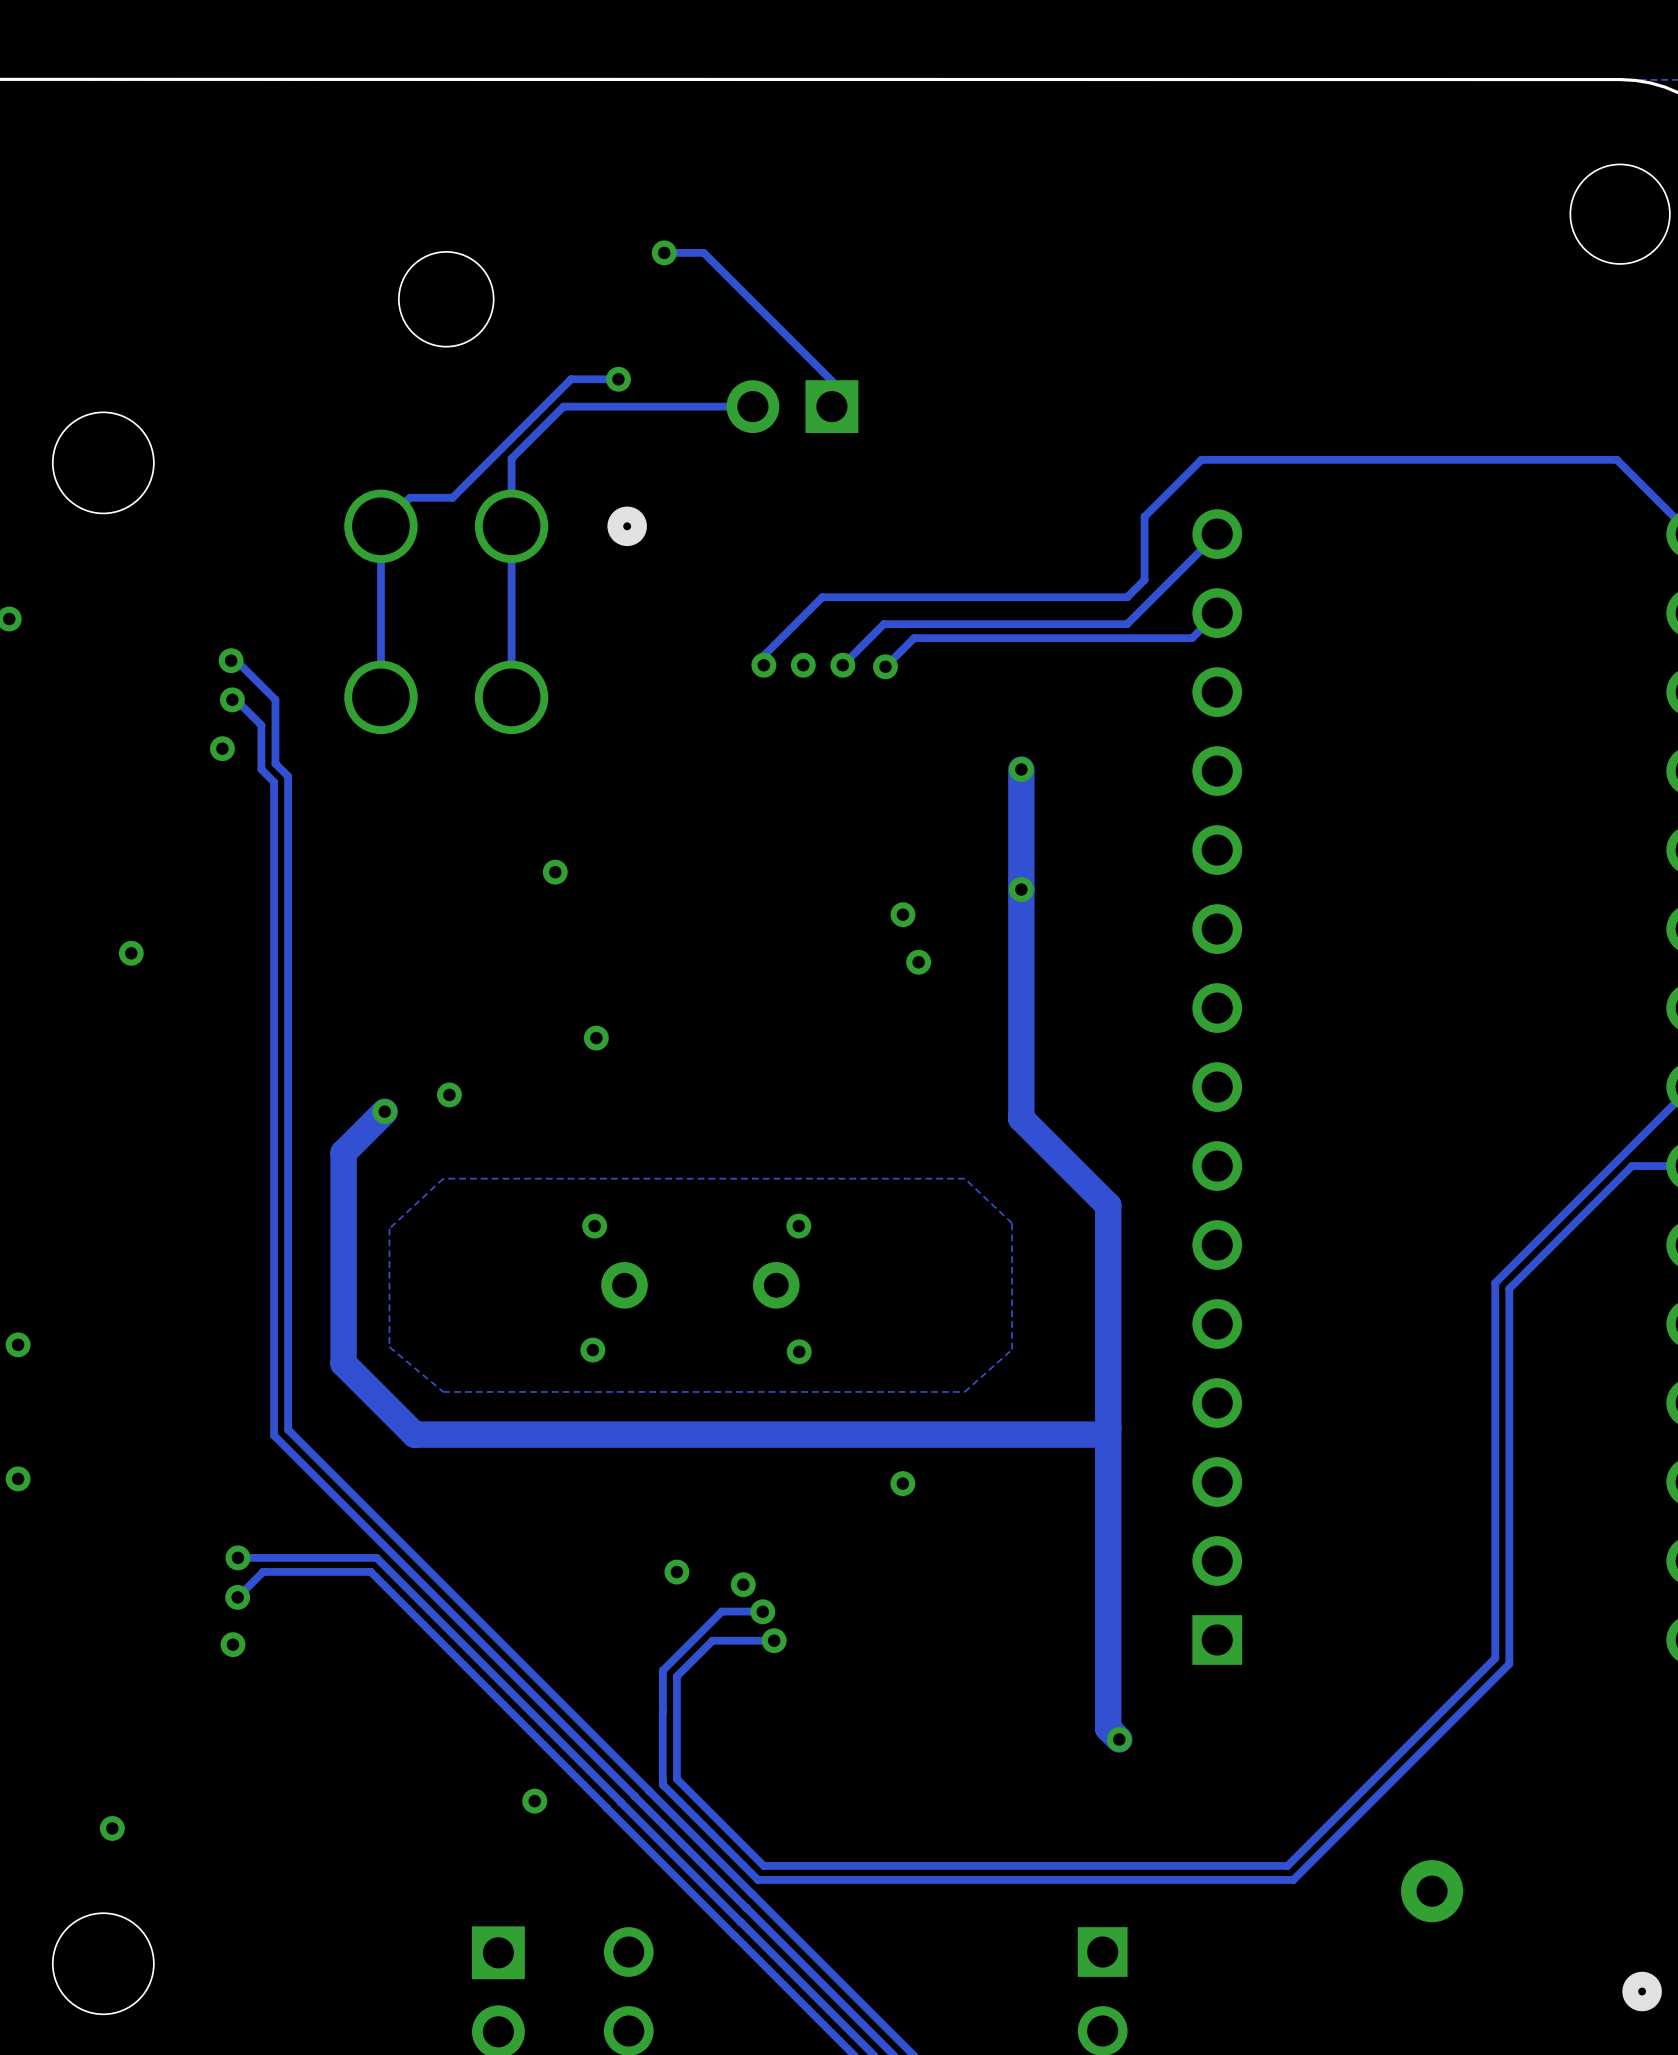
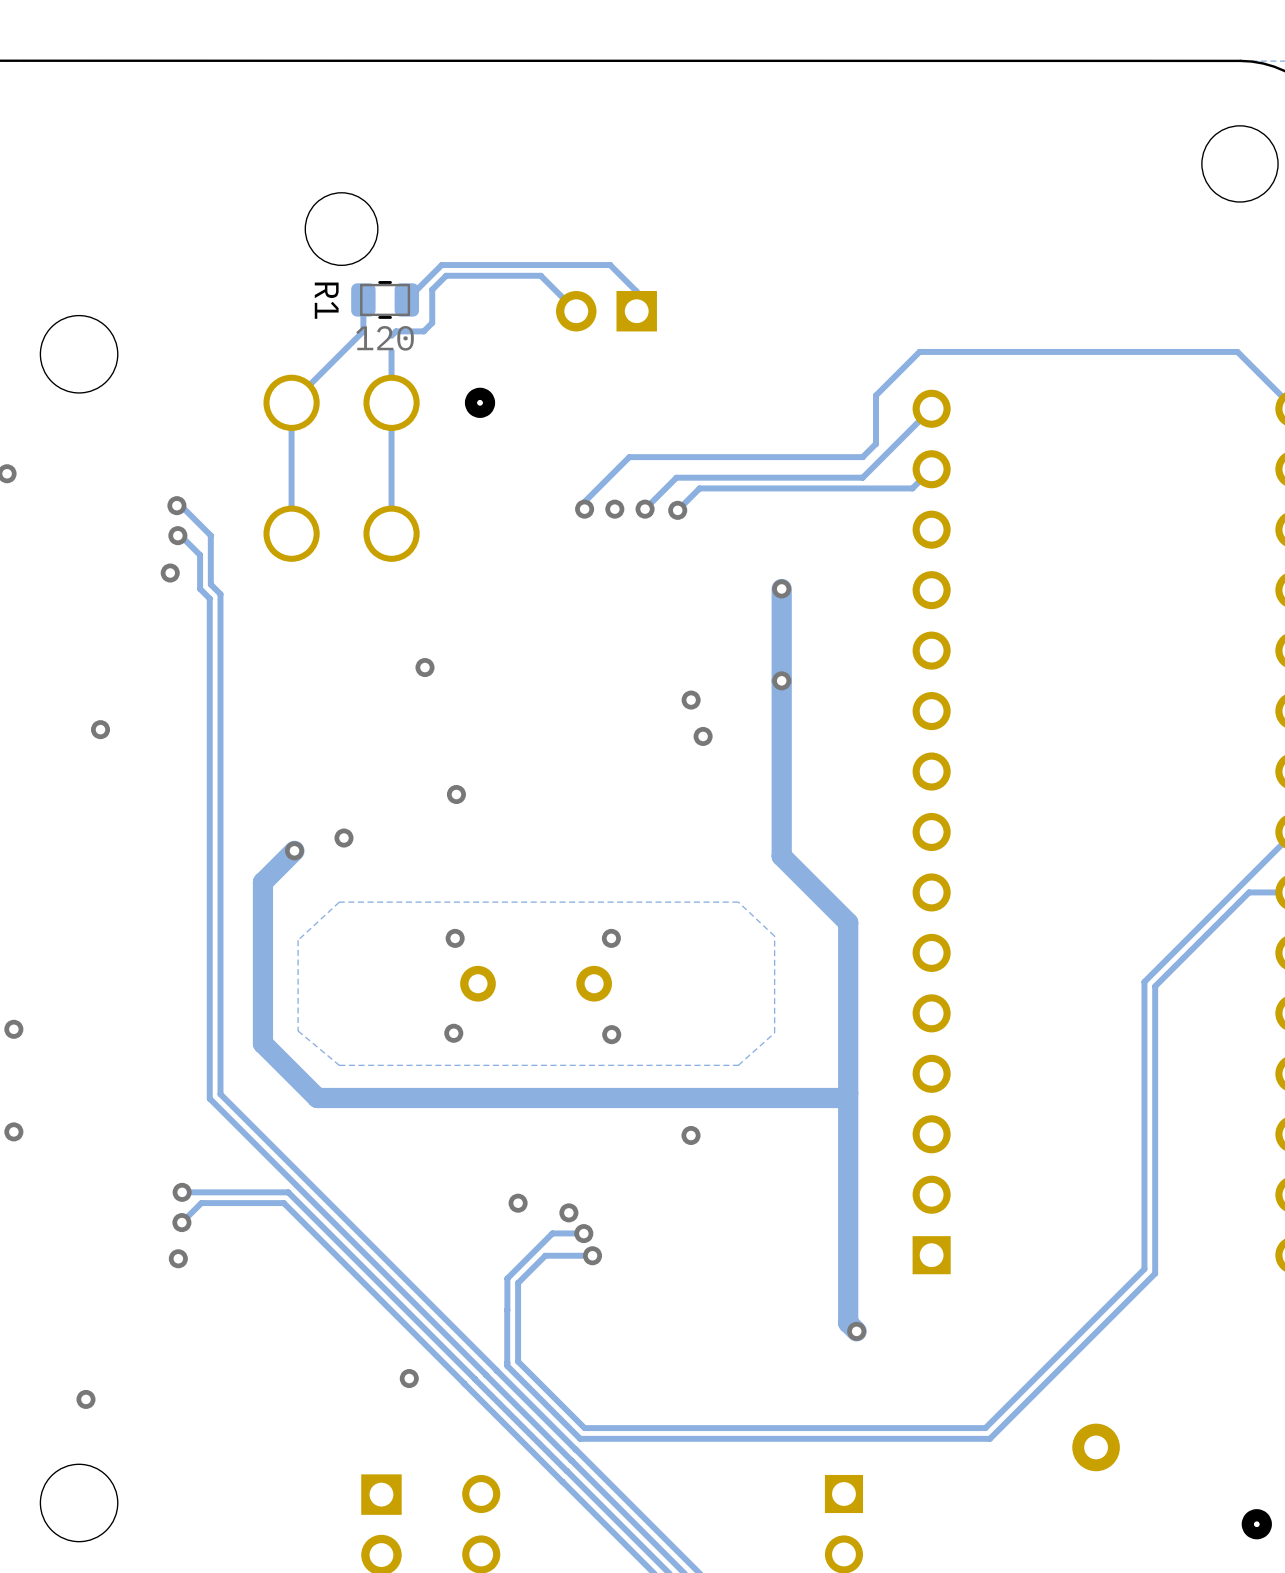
track: (664, 252) (703, 252) (797, 346) -> (406, 299) (441, 265) (610, 265)
via: (664, 252) -> none
track: (618, 379) (571, 379) (517, 432) -> none
via: (618, 379) -> none
R1: none -> 120 (385, 299)
track: (752, 406) (563, 406) (511, 458) -> (576, 311) (540, 275) (446, 275) (432, 289) (432, 322) (423, 331) (395, 331)
track: (511, 438) (452, 497) (409, 497) -> (363, 299) (363, 331) (313, 380)

